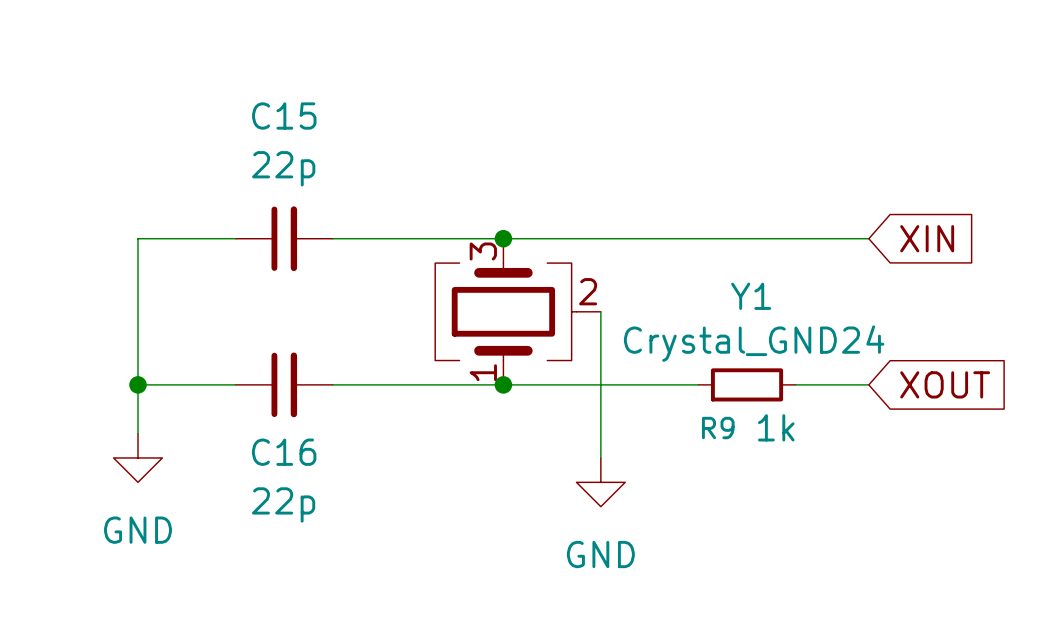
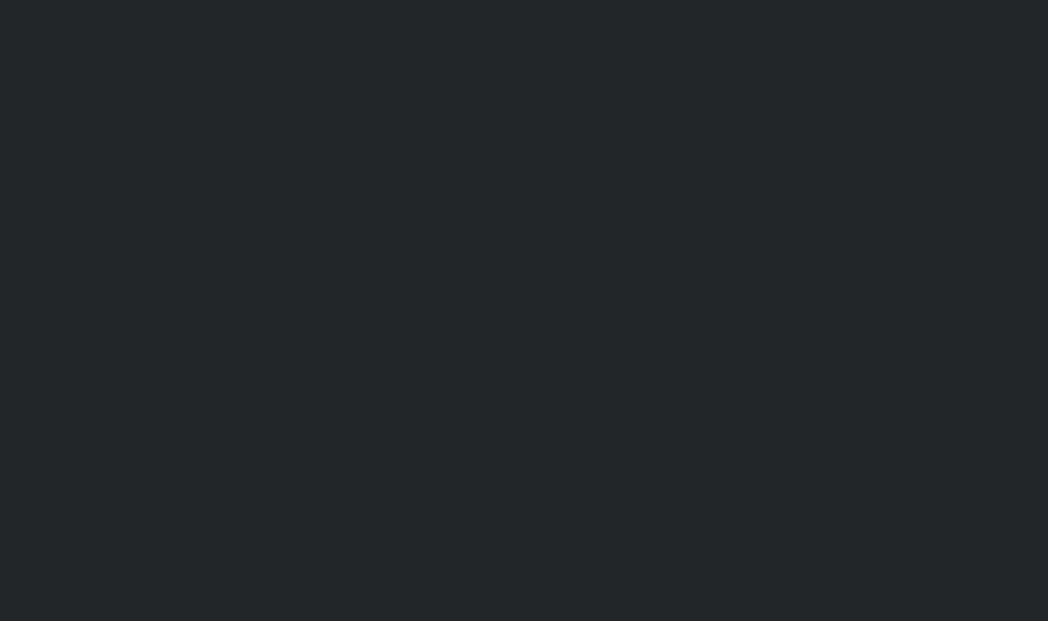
wire: (235, 238) (137, 238) (137, 433) -> none
C15: 22p (284, 238) -> none
wire: (332, 238) (868, 238) -> none
junction: (503, 238) -> none
global label: XIN (927, 238) -> none
Y1: Crystal_GND24 (518, 311) -> none
wire: (600, 311) (600, 457) -> none
wire: (137, 384) (235, 384) -> none
junction: (137, 384) -> none
C16: 22p (284, 384) -> none
wire: (332, 384) (698, 384) -> none
junction: (503, 384) -> none
R9: 1k (747, 384) -> none
wire: (795, 384) (868, 384) -> none
global label: XOUT (945, 384) -> none
power symbol: GND (137, 457) -> none
power symbol: GND (600, 482) -> none

